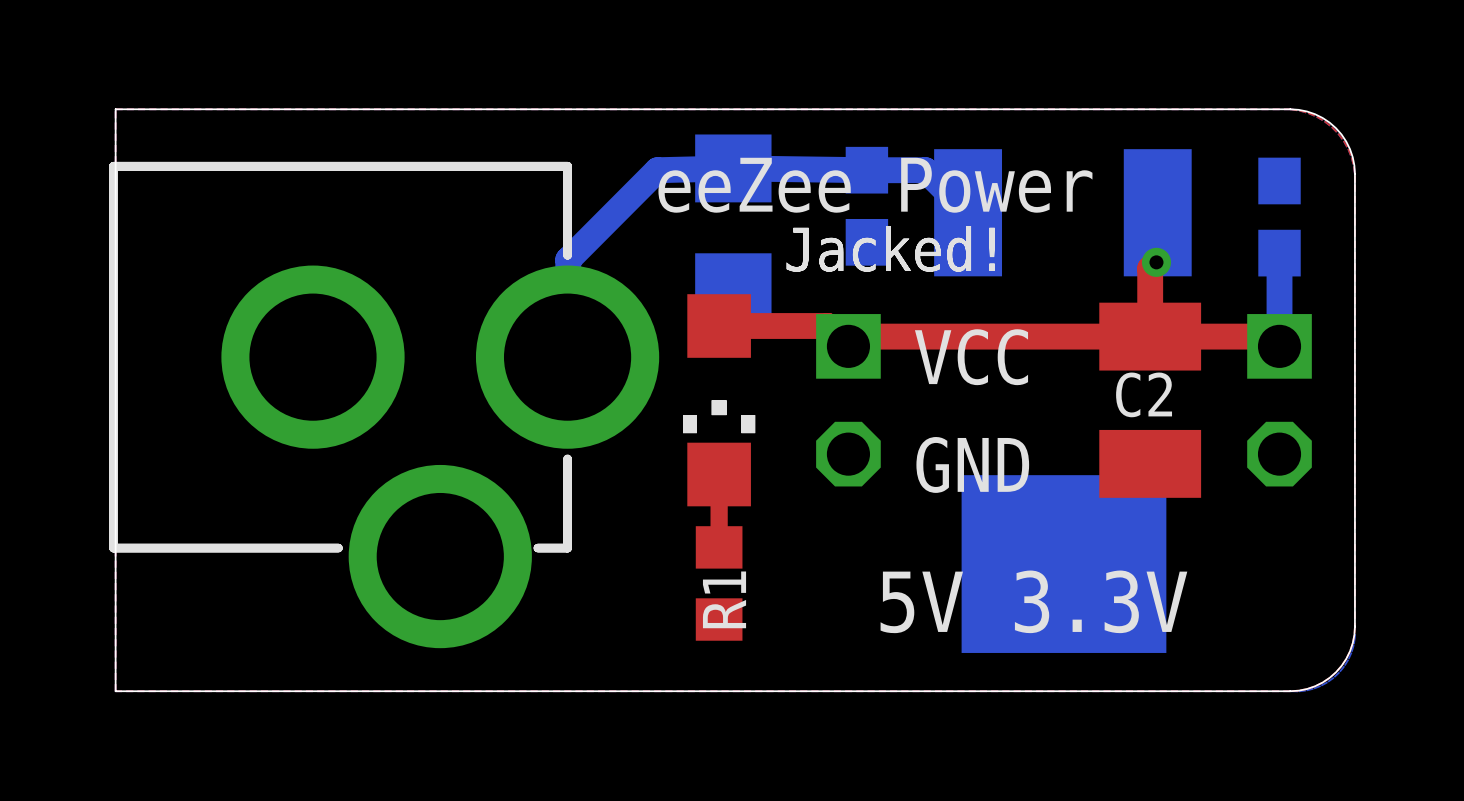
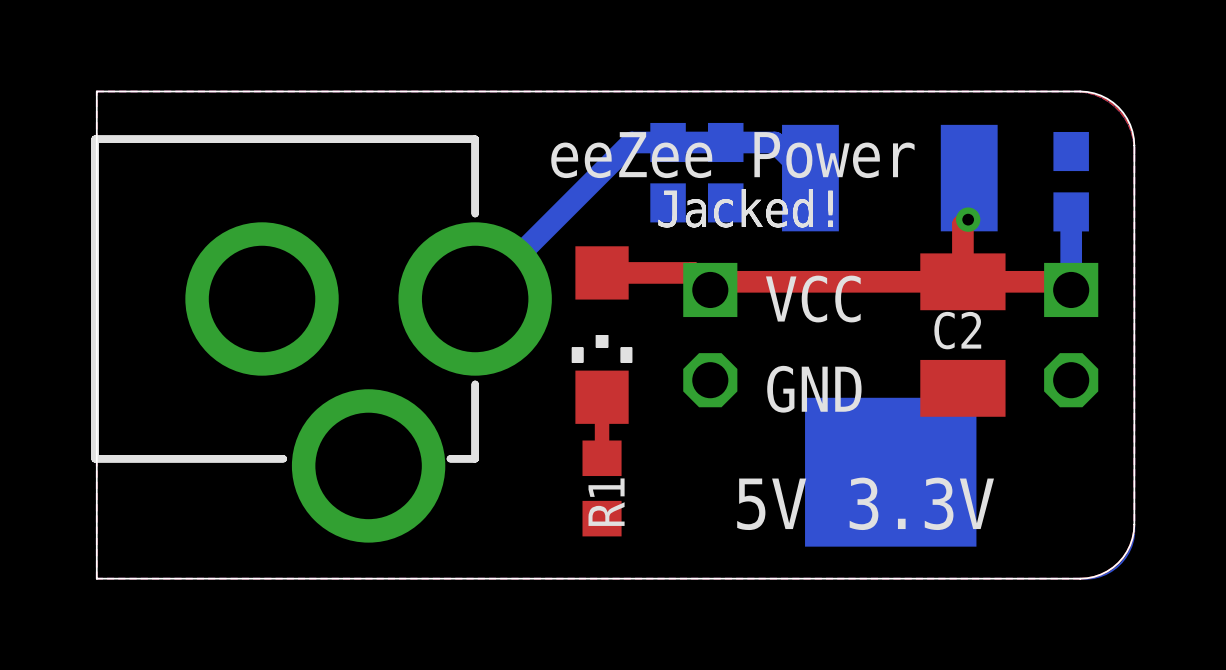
bottom track: (866, 170) (733, 168) (657, 170) (568, 259) (568, 357) -> (725, 142) (631, 142) (475, 298)
part: none -> (668, 172)
part: (733, 227) -> none

